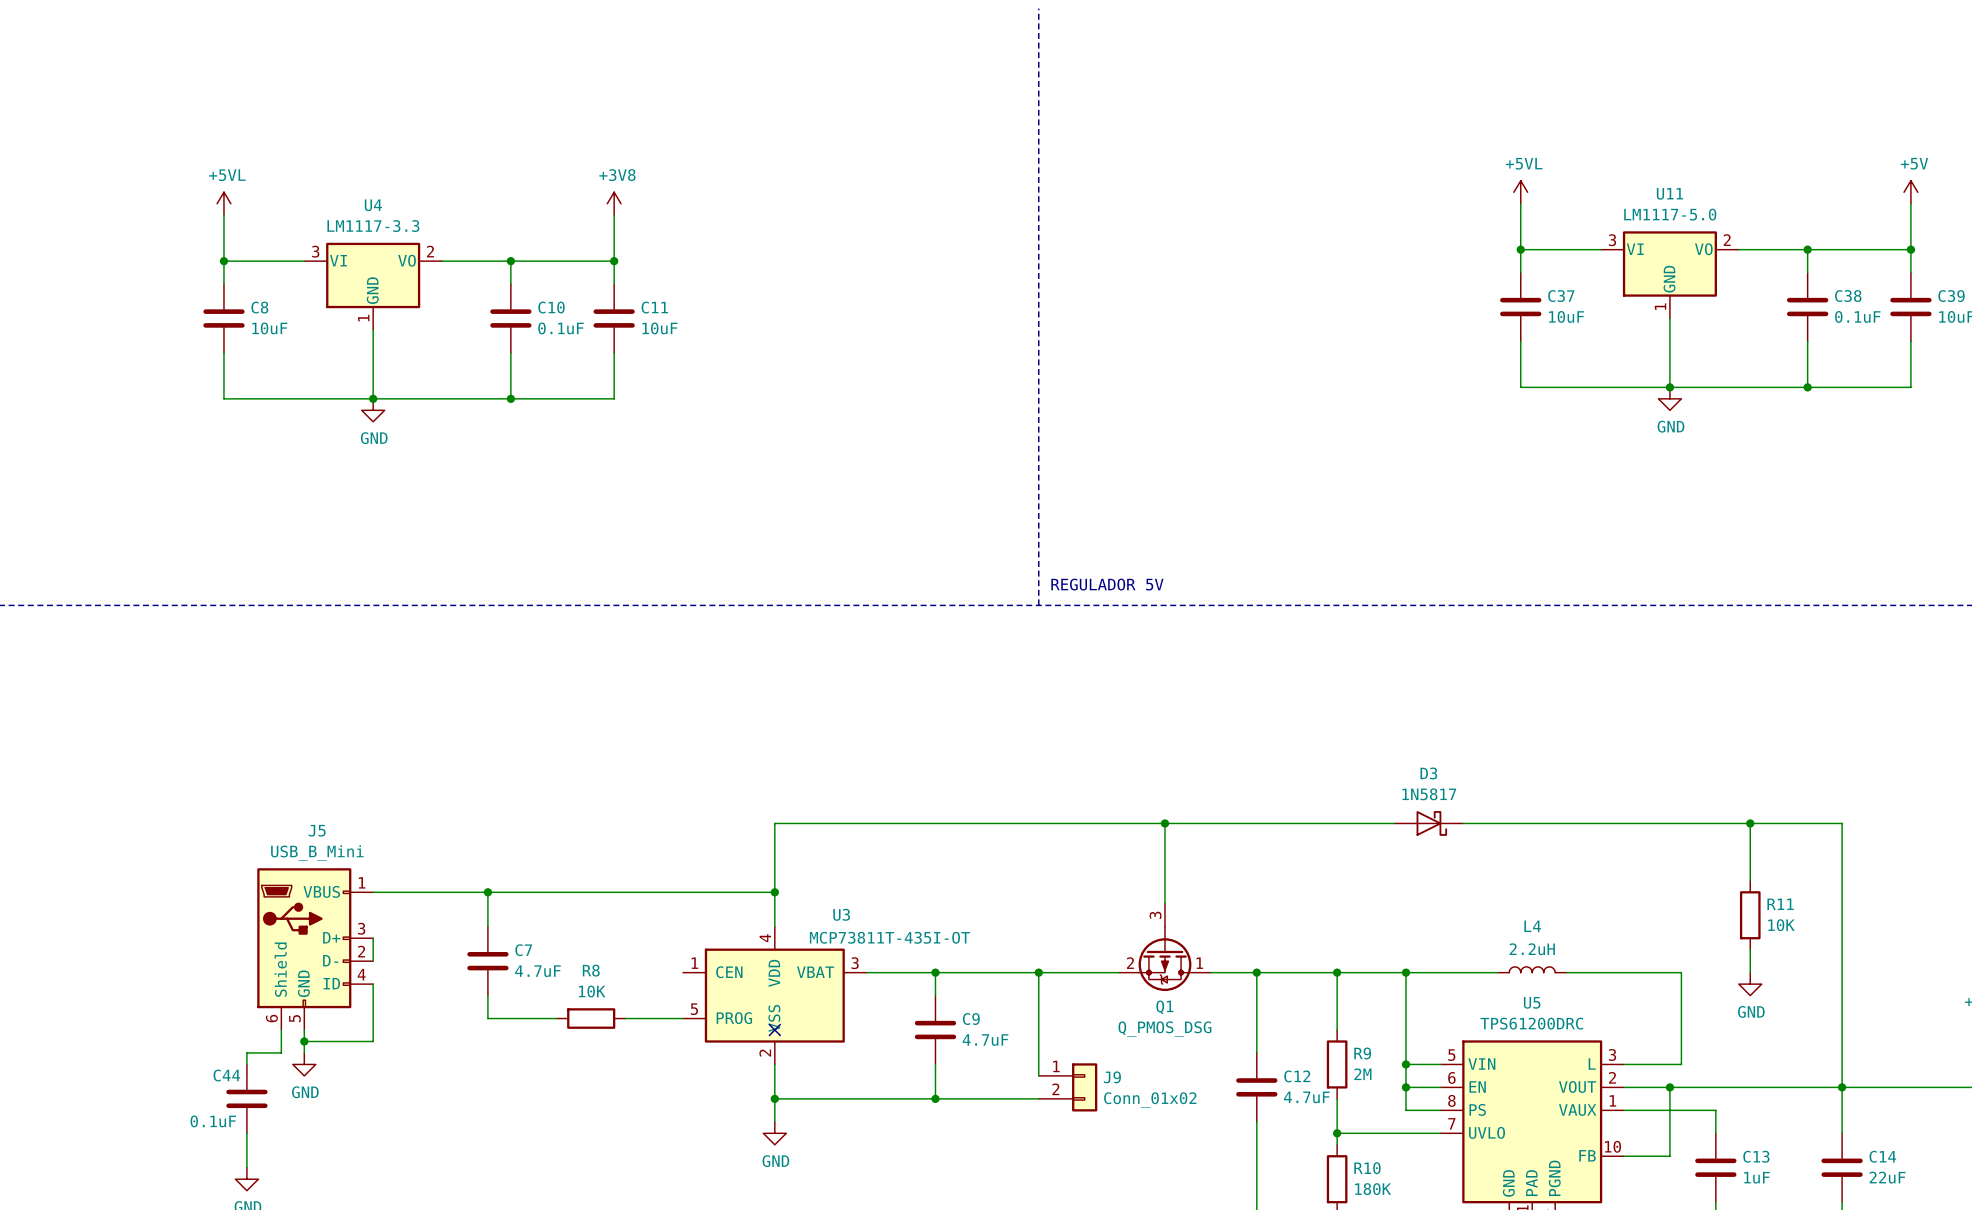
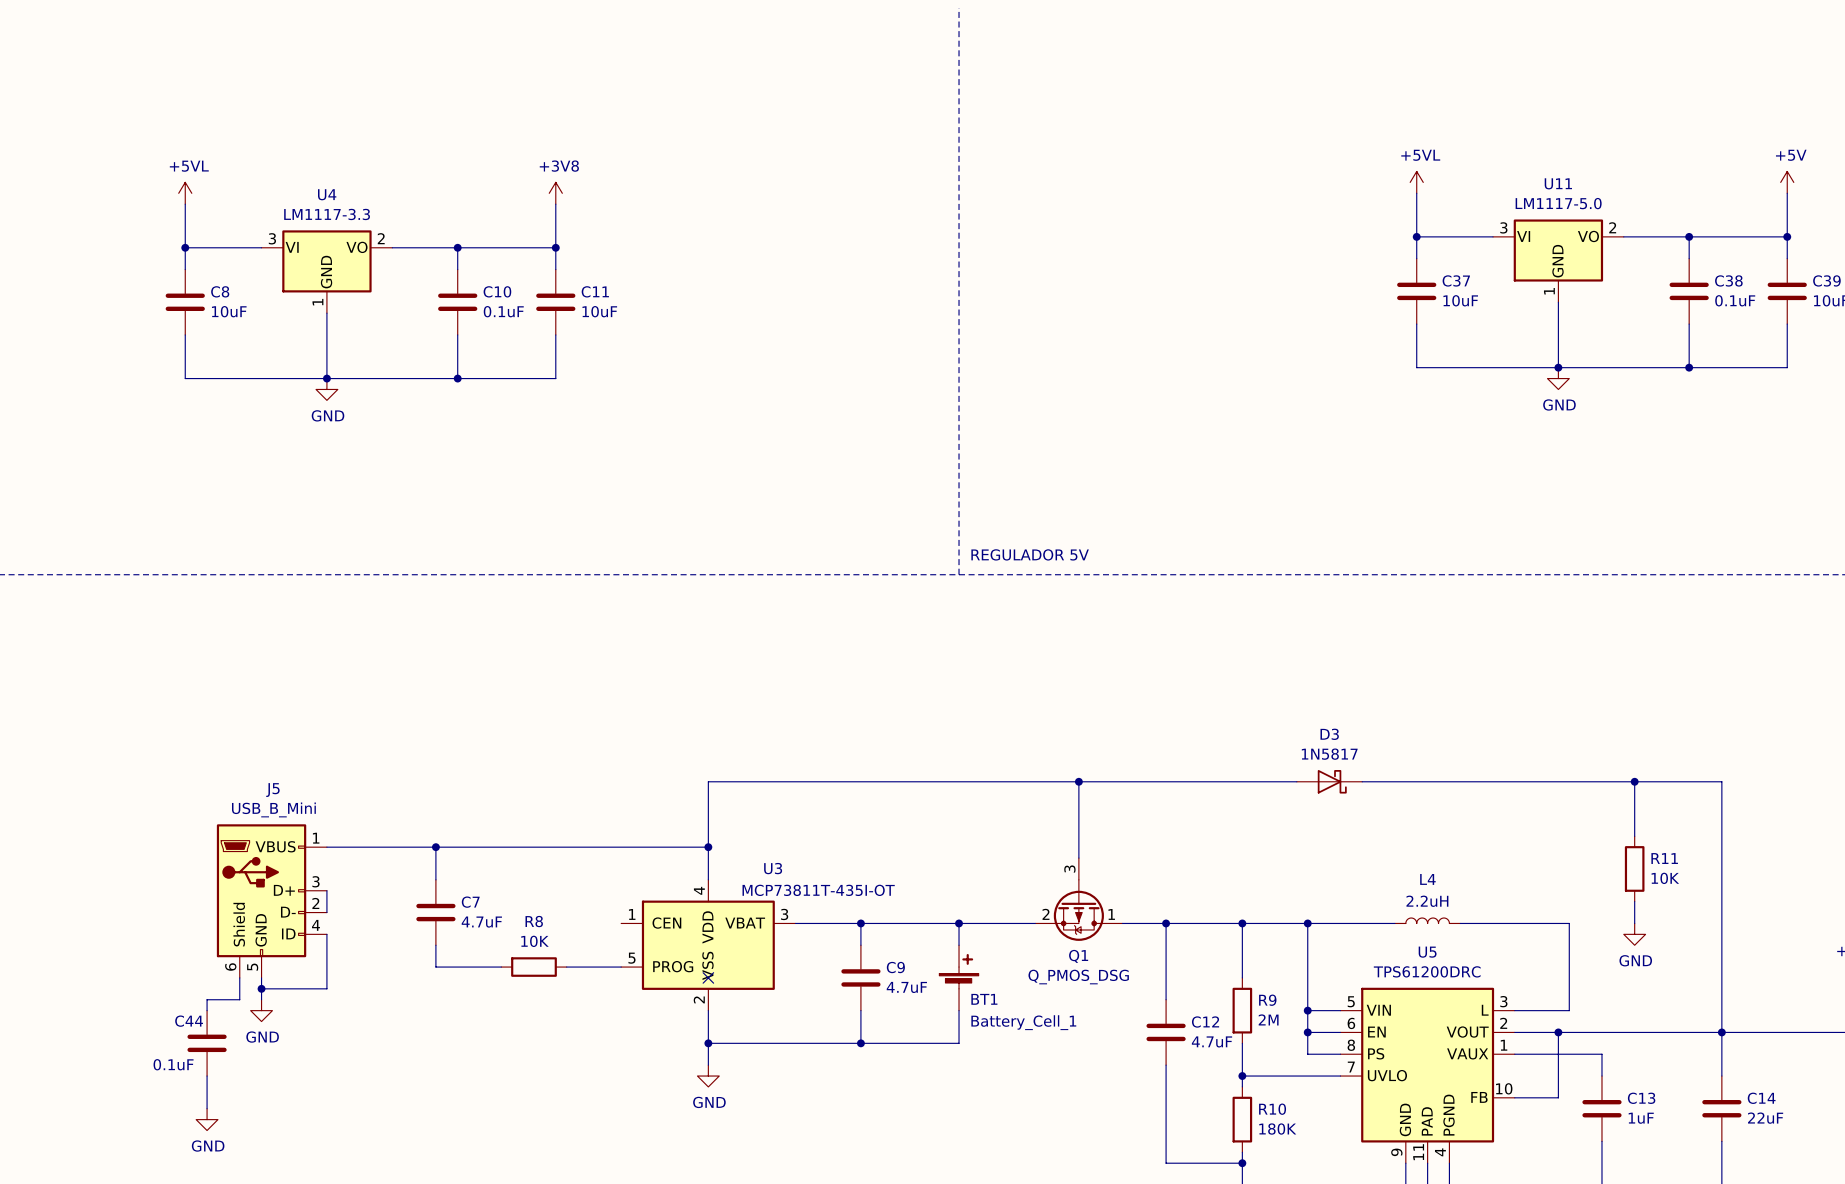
BT1: none -> Battery_Cell_1 (959, 977)
wire: none -> (959, 1021) (959, 1043)
J9: Conn_01x02 (1068, 1087) -> none

